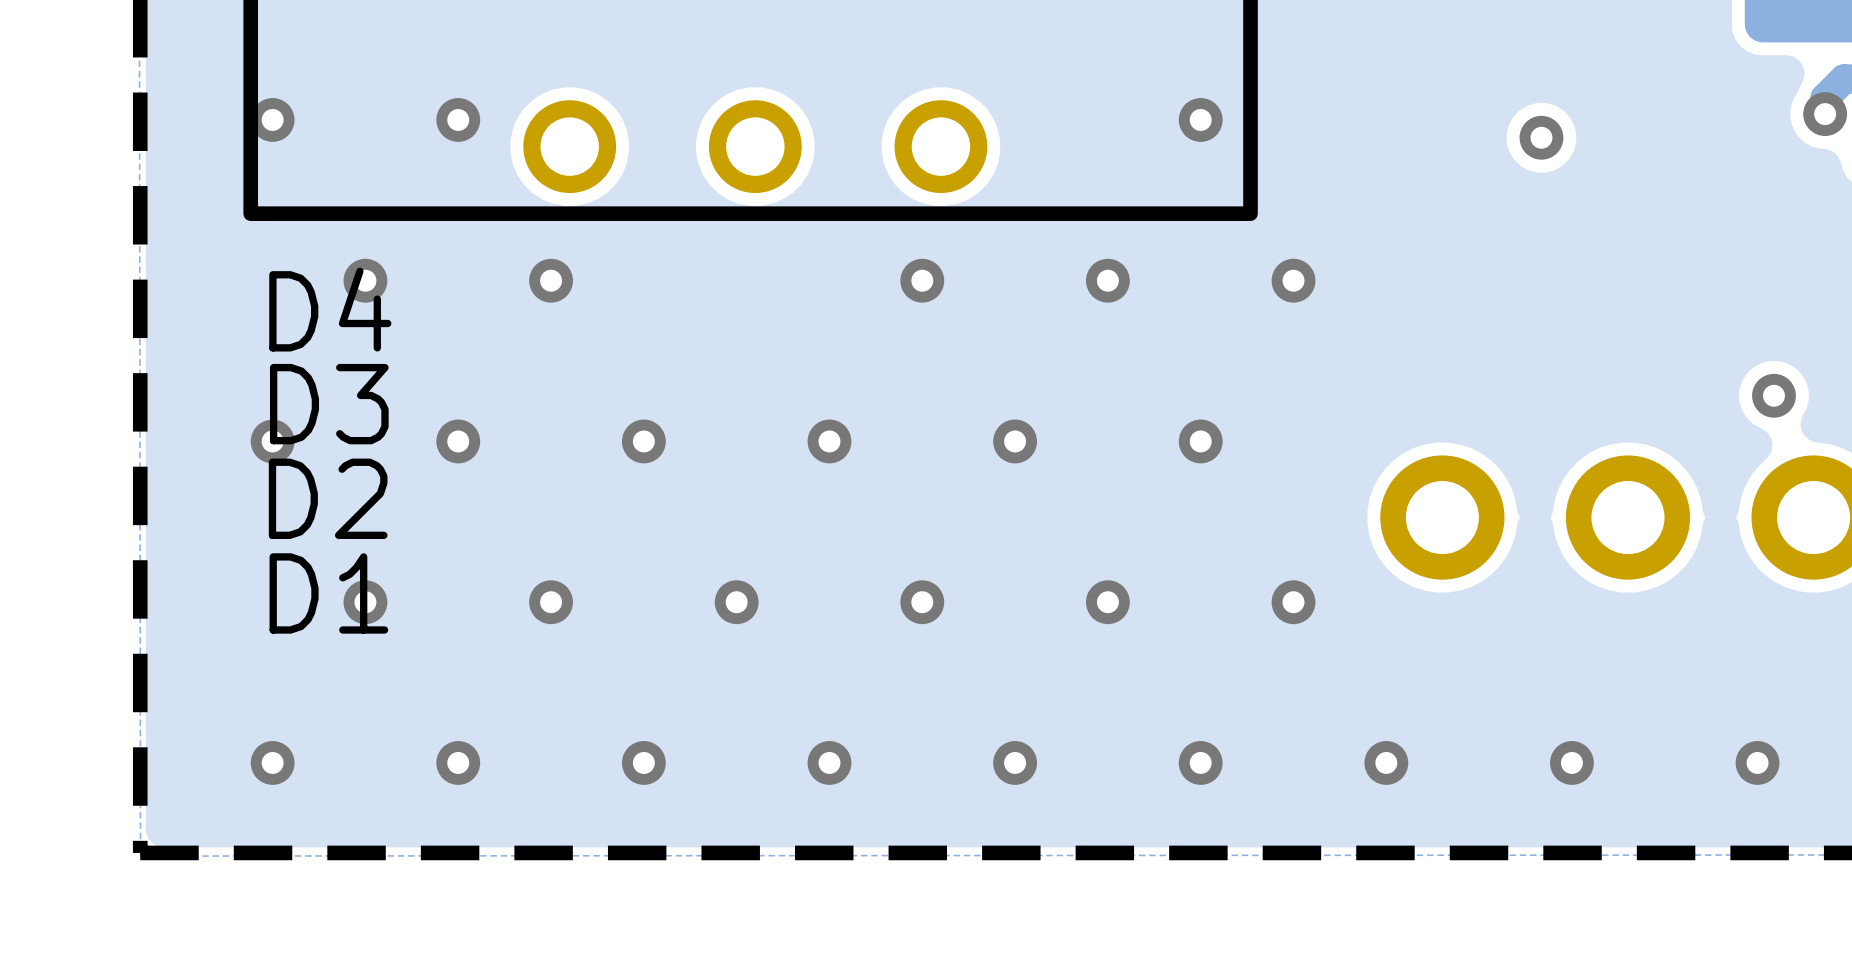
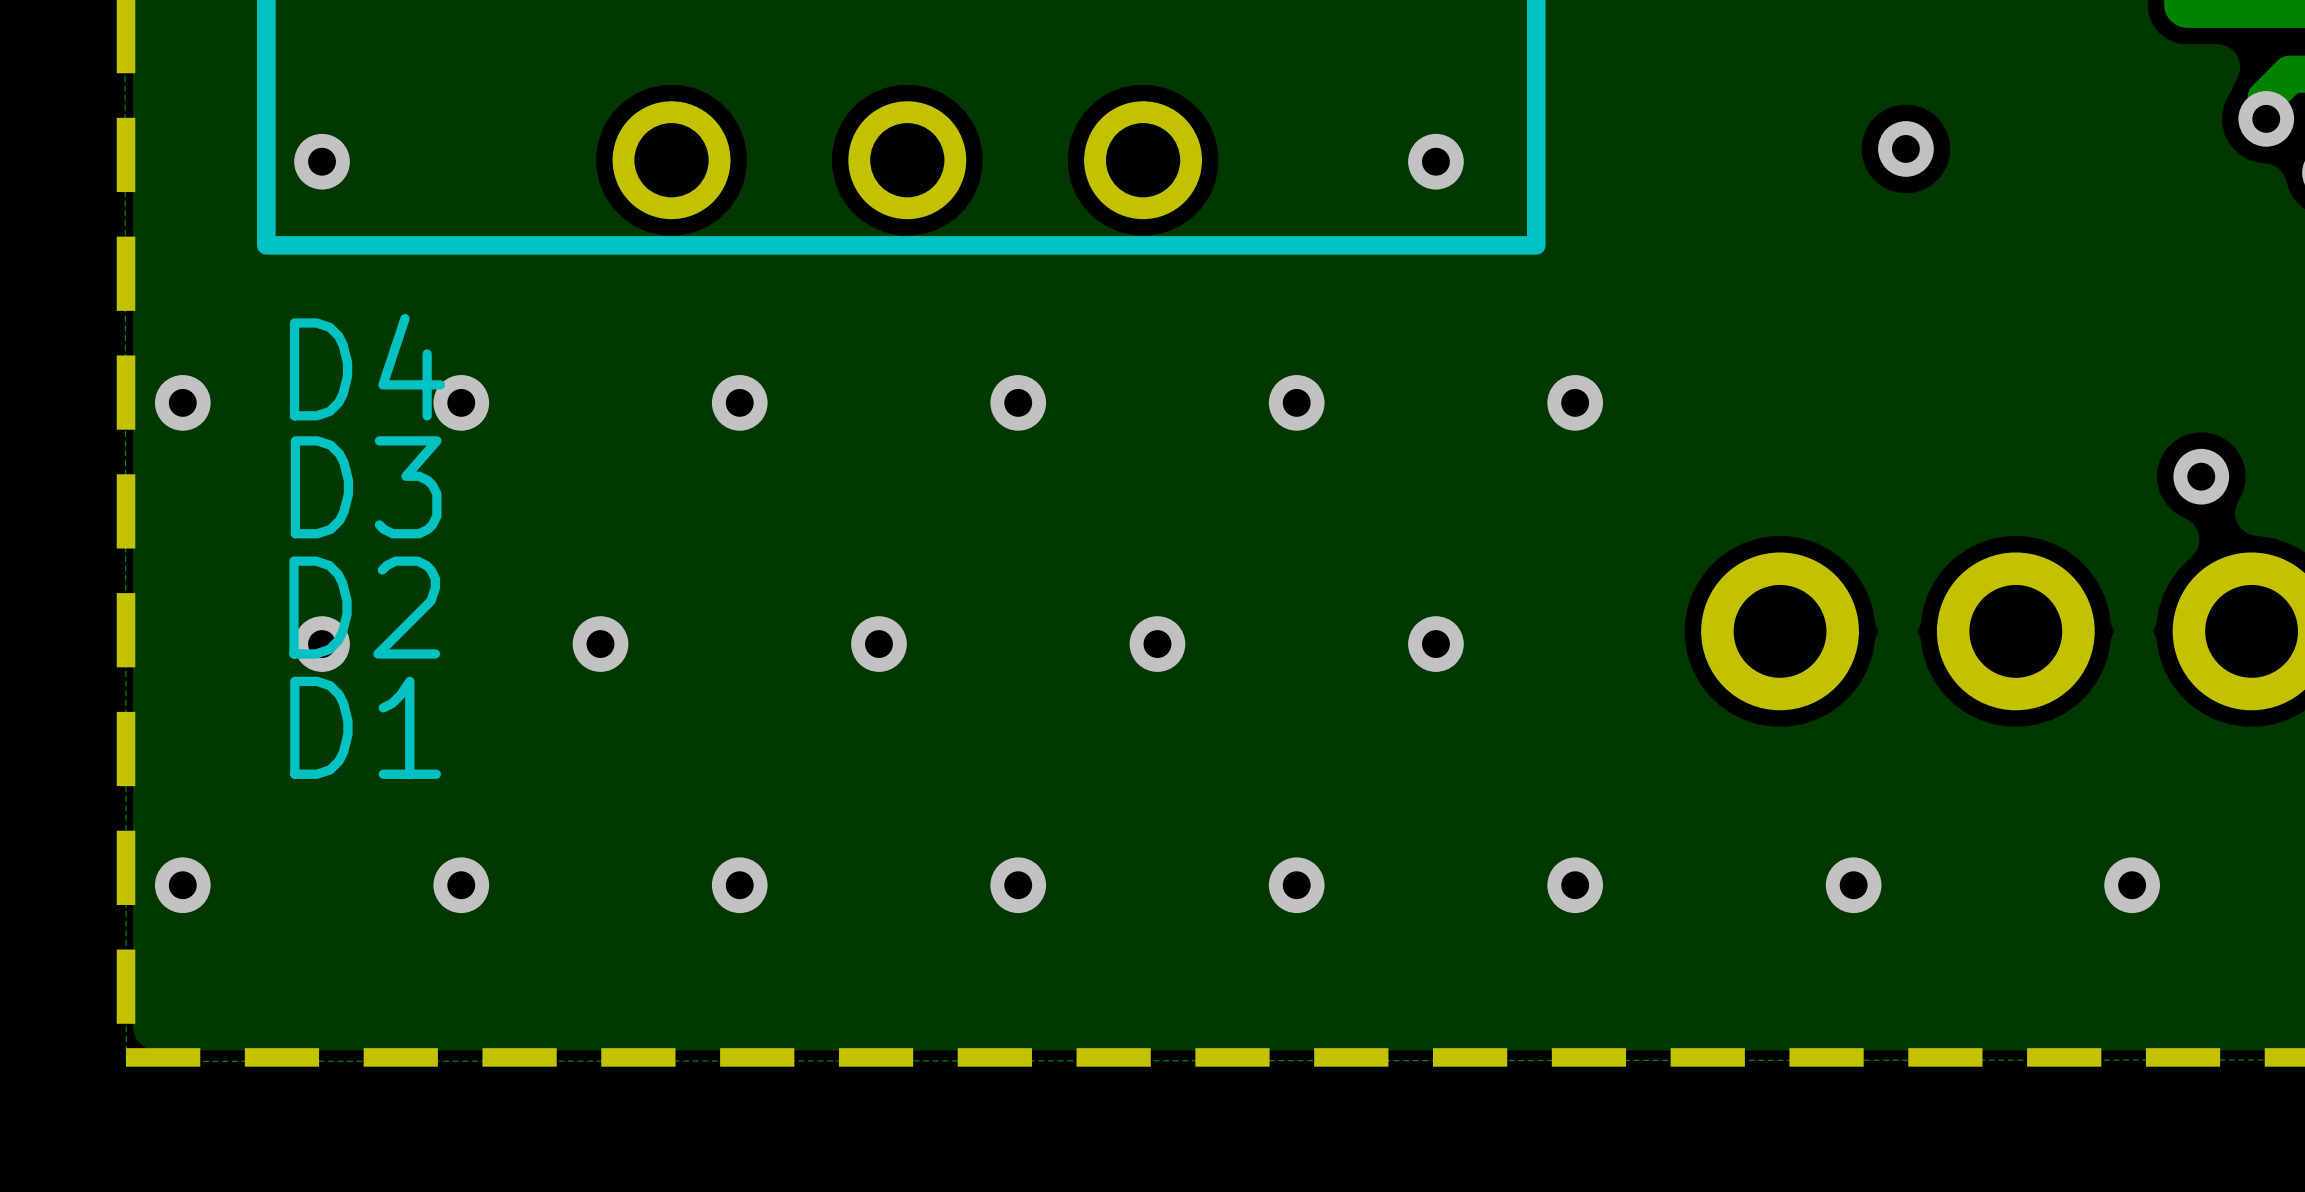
via position: (272, 119) -> (322, 161)
via: (458, 119) -> none
via position: (1200, 119) -> (1435, 161)
via: (365, 280) -> none
via: (551, 280) -> none
via: (922, 280) -> none
via: (1107, 280) -> none
via position: (1293, 280) -> (1575, 402)
via: none -> (182, 402)
via: none -> (461, 402)
via: none -> (739, 402)
via: none -> (1018, 402)
via: none -> (1296, 402)
via: (272, 441) -> none
via: (458, 441) -> none
via: (643, 441) -> none
via: (829, 441) -> none
via: (1015, 441) -> none
via: (1200, 441) -> none
via: none -> (322, 644)
via: none -> (600, 644)
via: none -> (878, 644)
via: none -> (1157, 644)
via: none -> (1435, 644)
via: (365, 602) -> none
via: (551, 602) -> none
via: (736, 602) -> none
via: (922, 602) -> none
via: (1107, 602) -> none
via: (1293, 602) -> none
via: none -> (182, 885)
via: none -> (461, 885)
via: none -> (1296, 885)
via: none -> (1575, 885)
via: none -> (1853, 885)
via: (272, 762) -> none
via: (458, 762) -> none
via position: (643, 762) -> (739, 885)
via position: (829, 762) -> (1018, 885)
via: (1015, 762) -> none
via: (1200, 762) -> none
via: (1386, 762) -> none
via: (1571, 762) -> none
via position: (1757, 762) -> (2132, 885)

